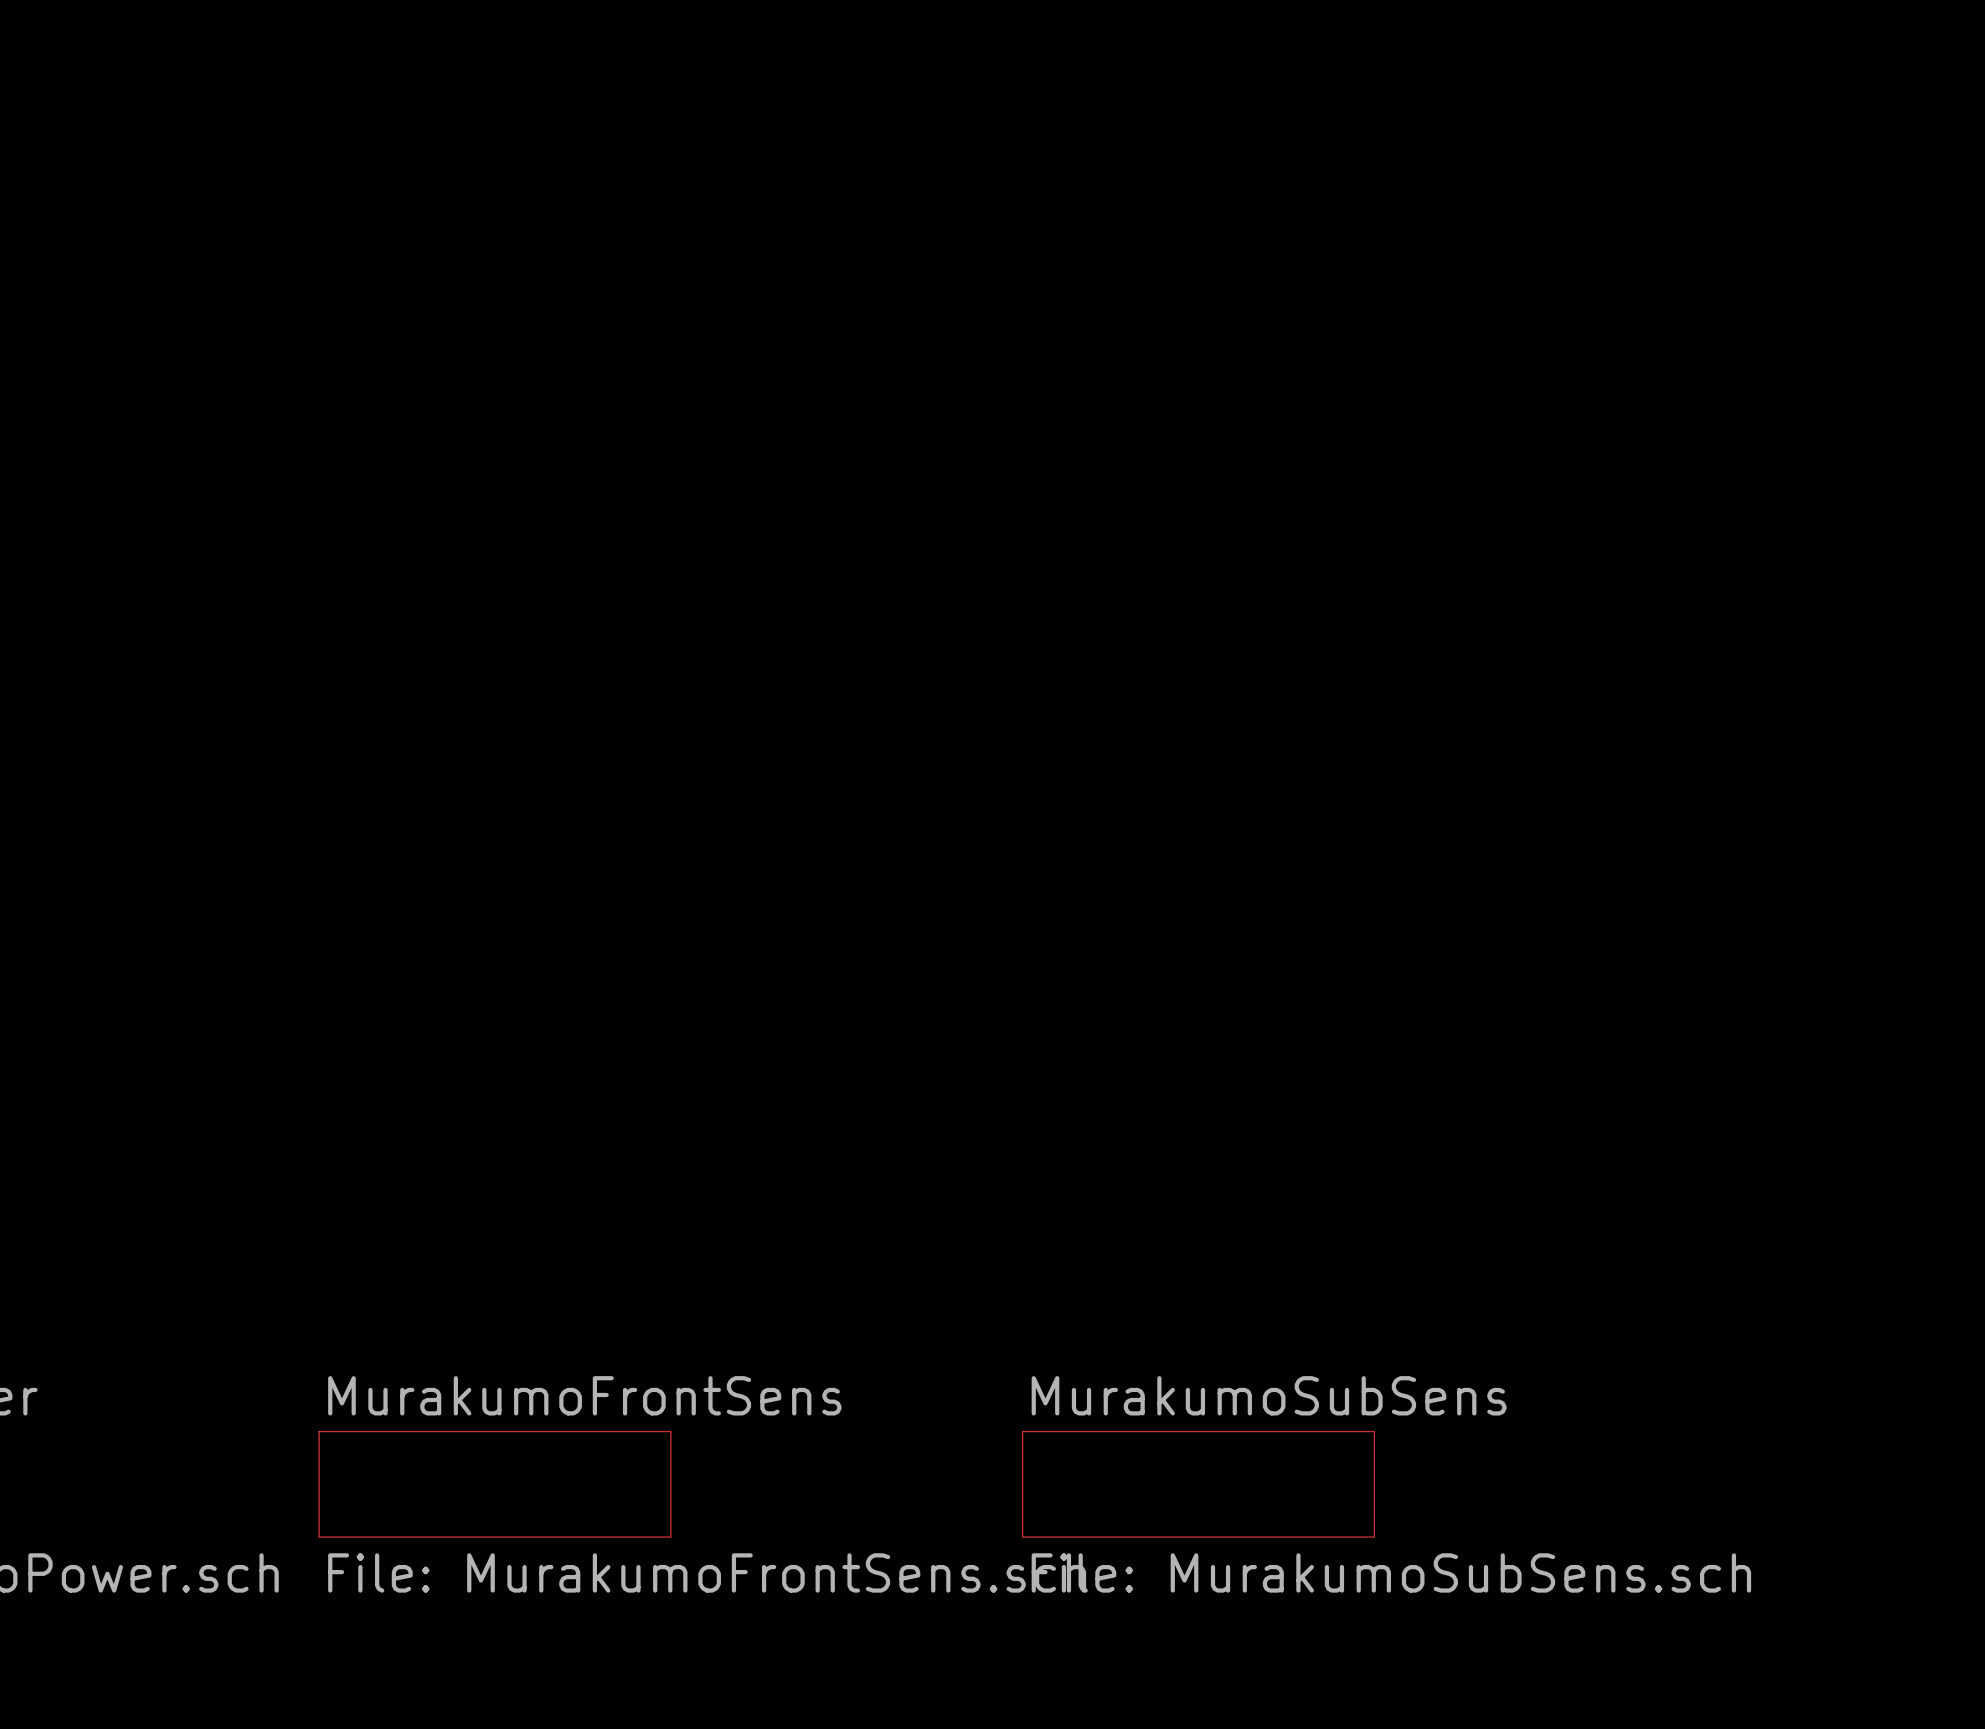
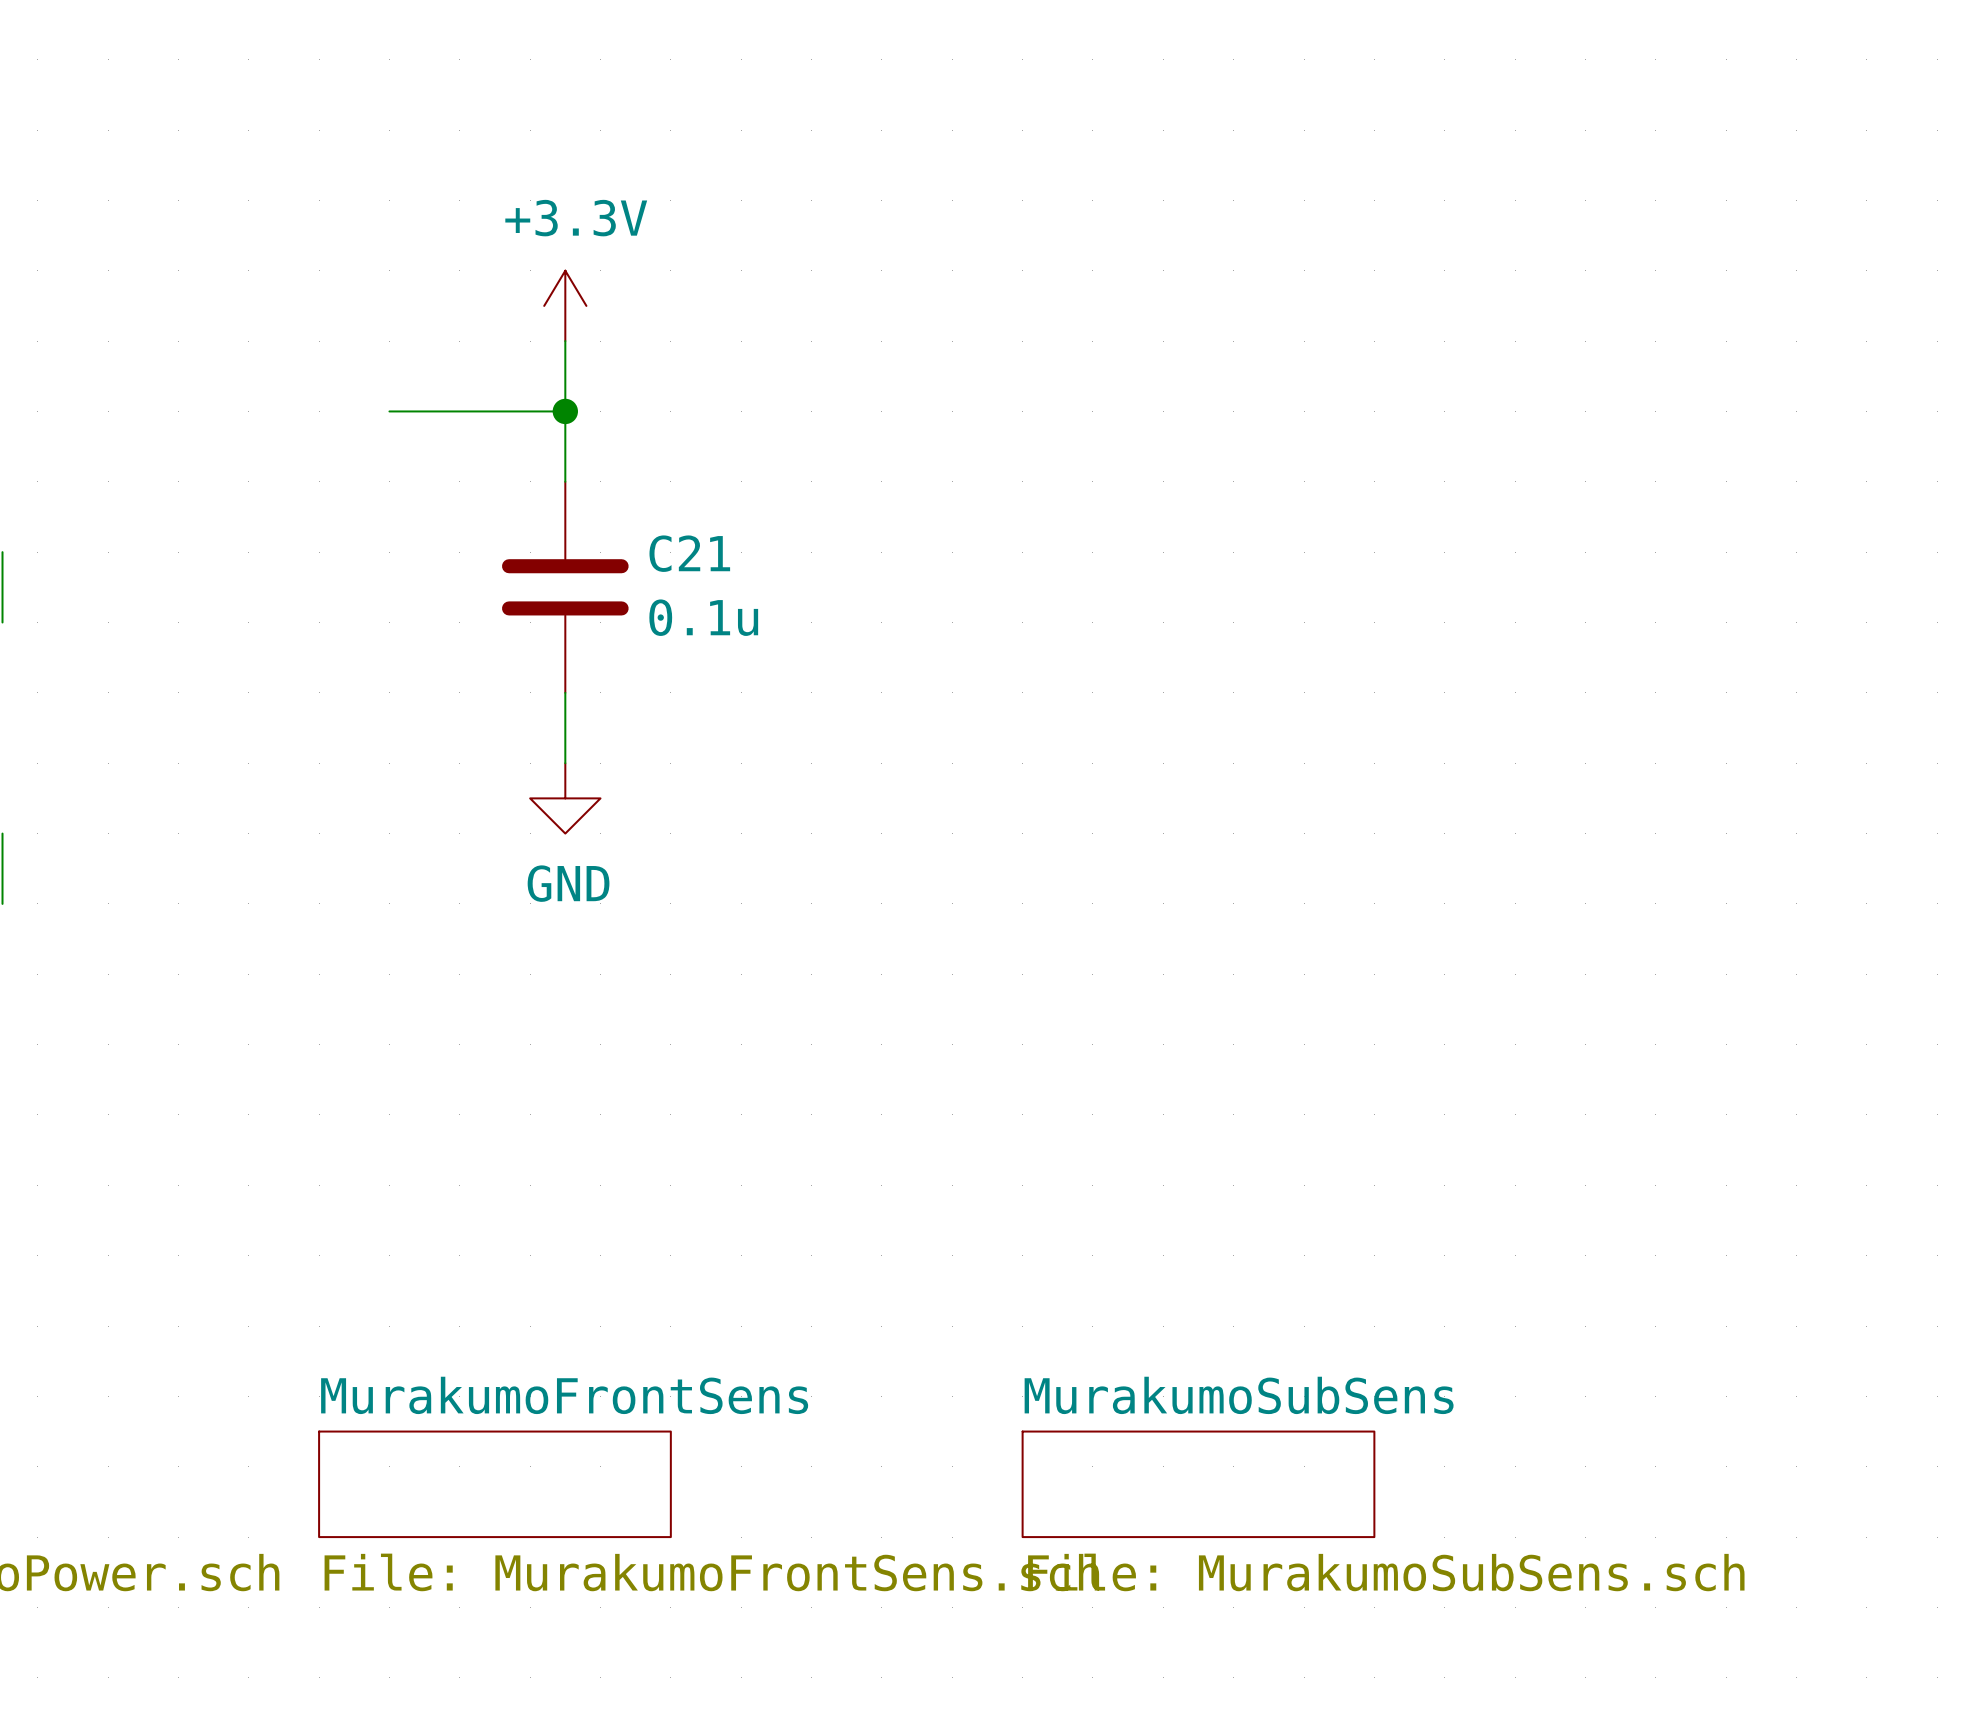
power symbol: none -> +3.3V (565, 305)
wire: none -> (565, 341) (565, 481)
wire: none -> (389, 411) (565, 411)
junction: none -> (565, 411)
wire: none -> (2, 552) (2, 622)
C21: none -> 0.1u (565, 587)
wire: none -> (565, 692) (565, 763)
power symbol: none -> GND (565, 798)
wire: none -> (2, 833) (2, 903)

